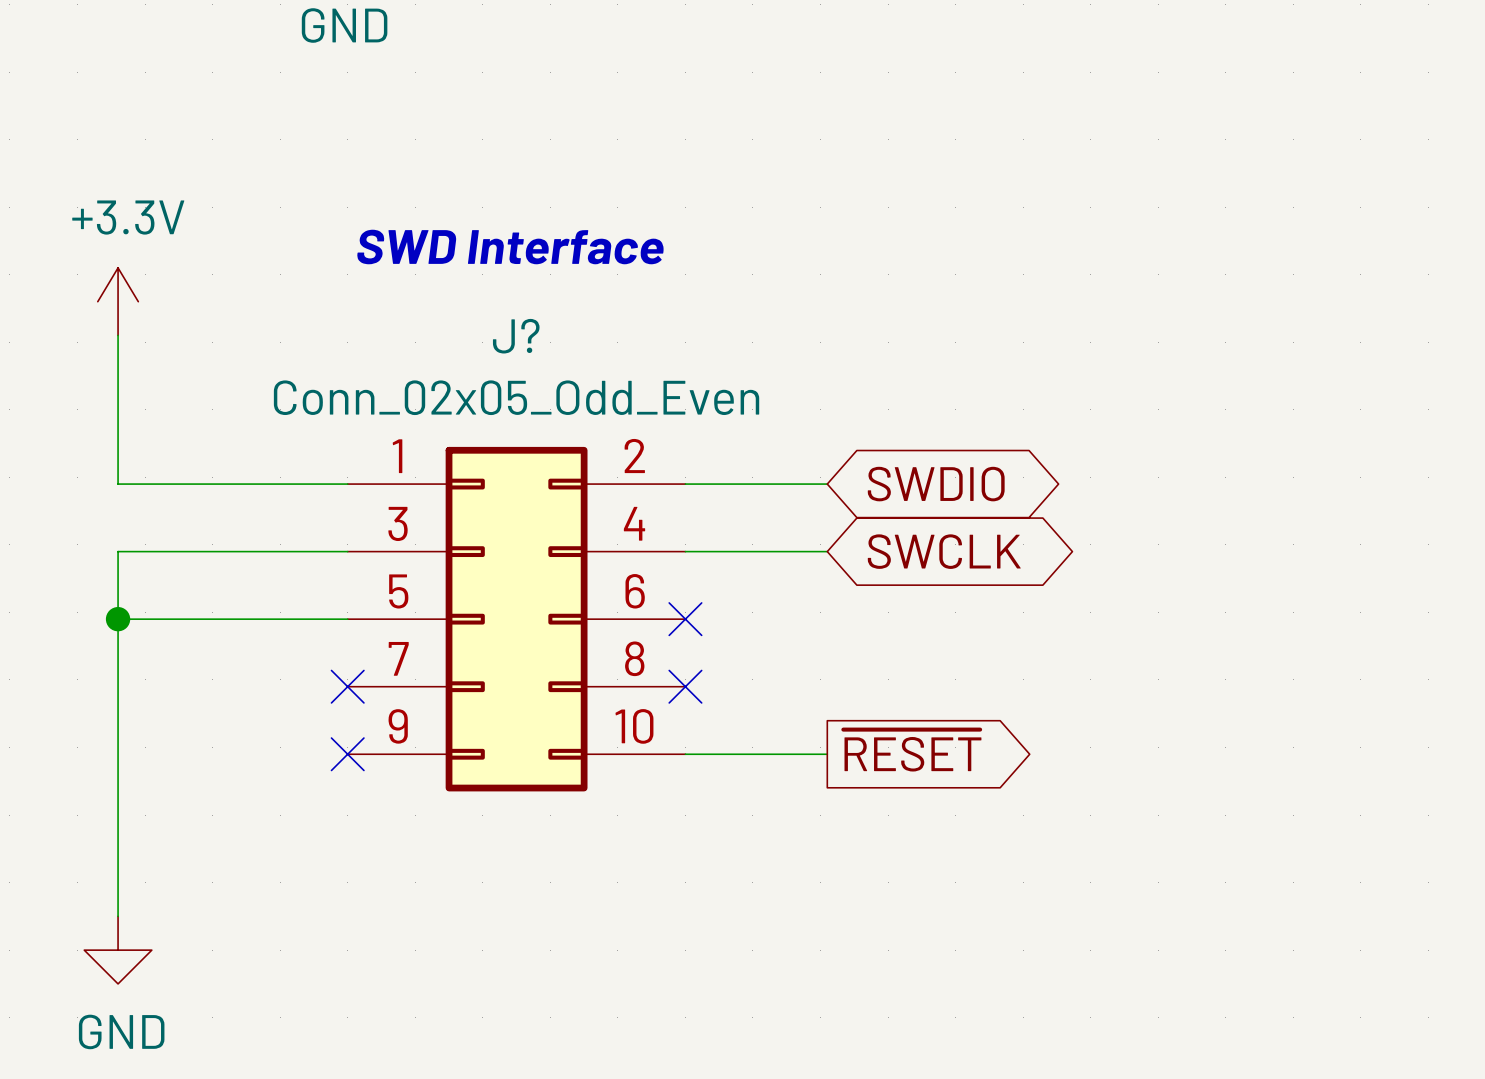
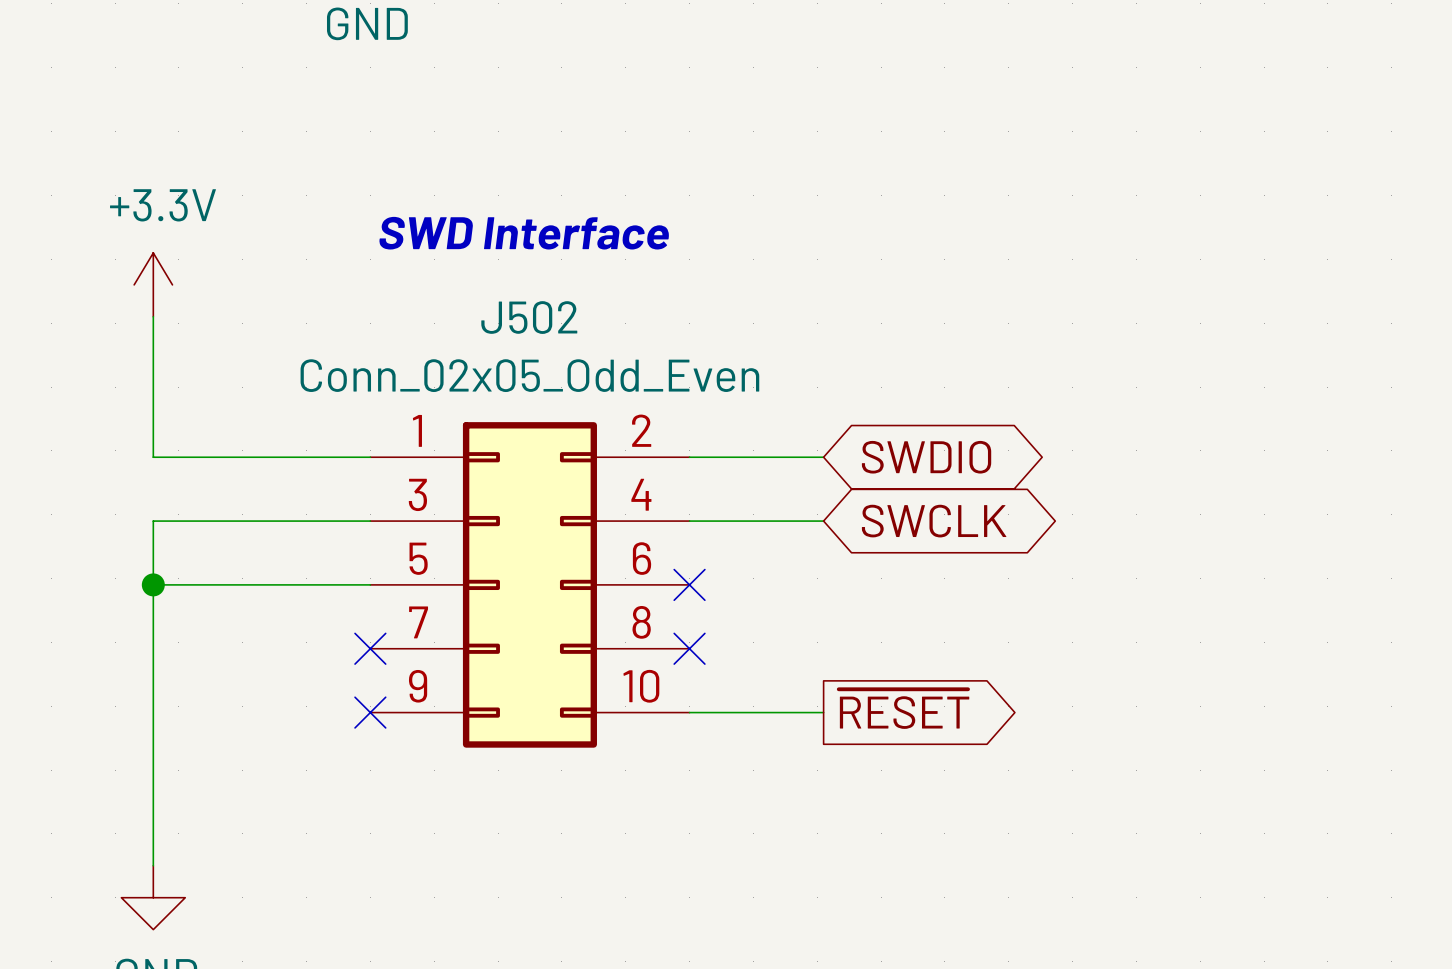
J? name: J? (516, 336) -> J502 (529, 317)

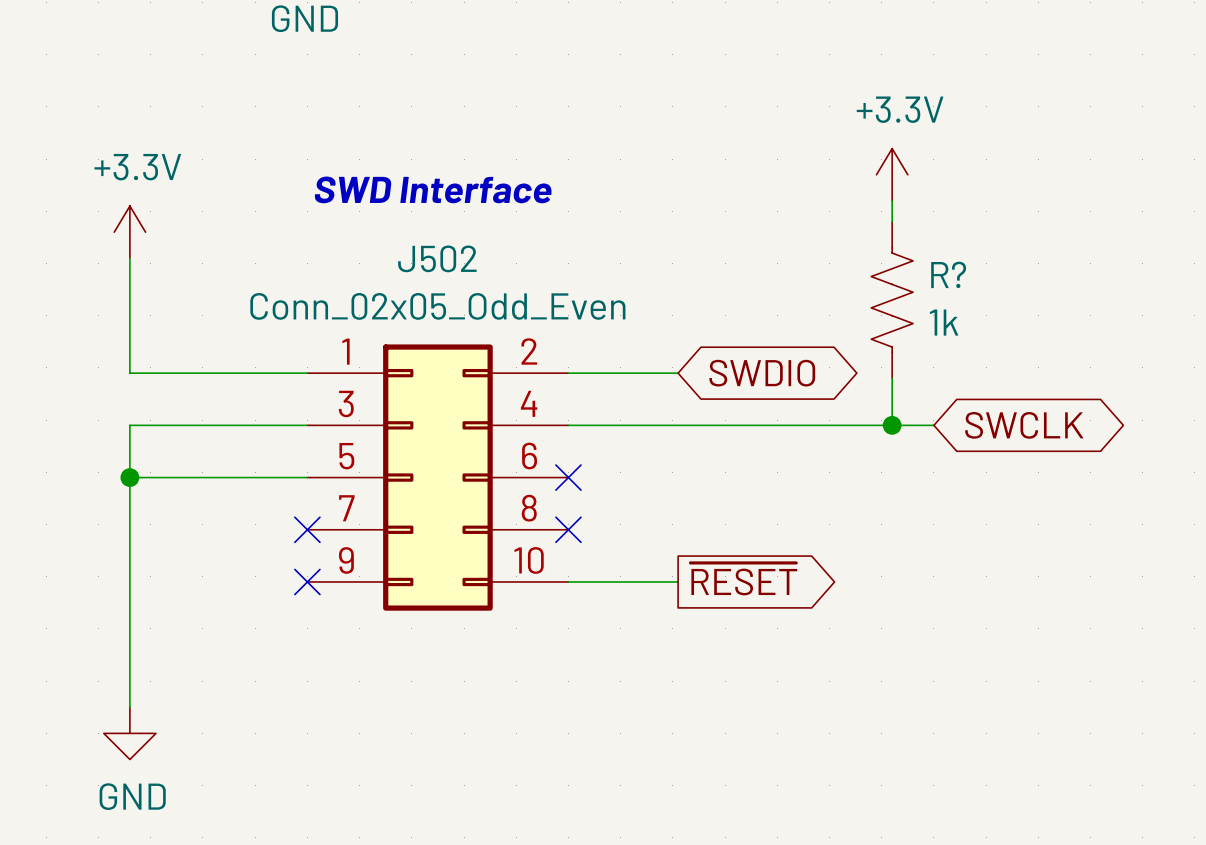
power symbol: none -> +3.3V (892, 174)
wire: none -> (892, 200) (892, 221)
R?: none -> 1k (892, 300)
wire: none -> (892, 378) (892, 425)
wire: none -> (678, 425) (933, 425)
global label position: SWCLK (934, 521) -> SWCLK (1024, 425)
junction: none -> (892, 425)

